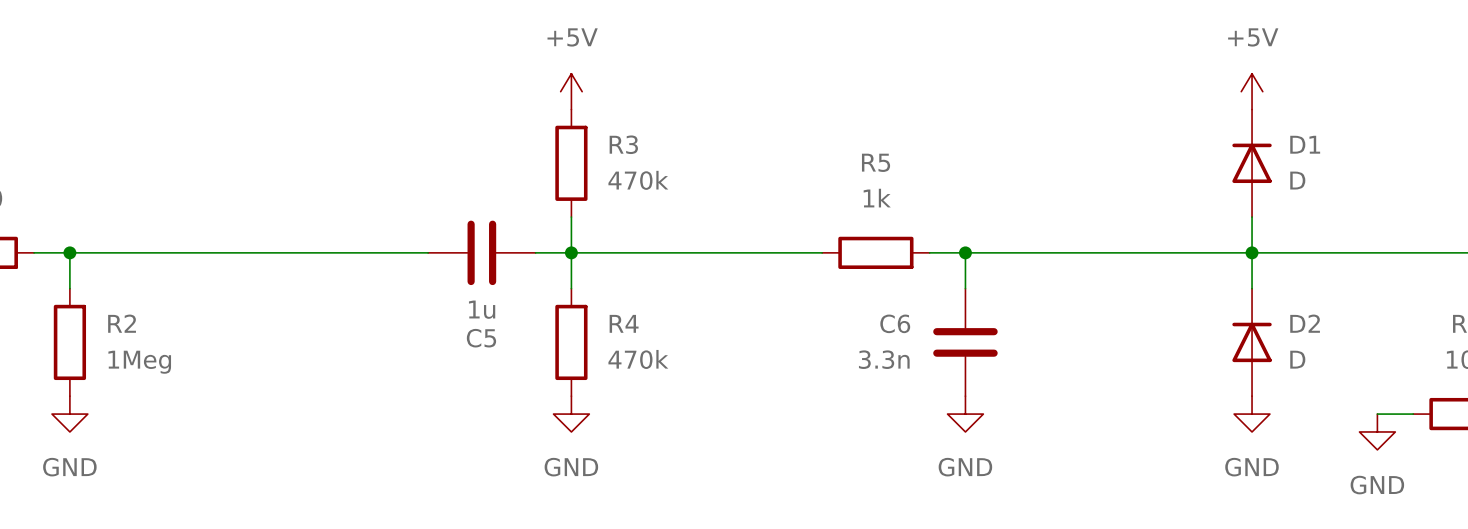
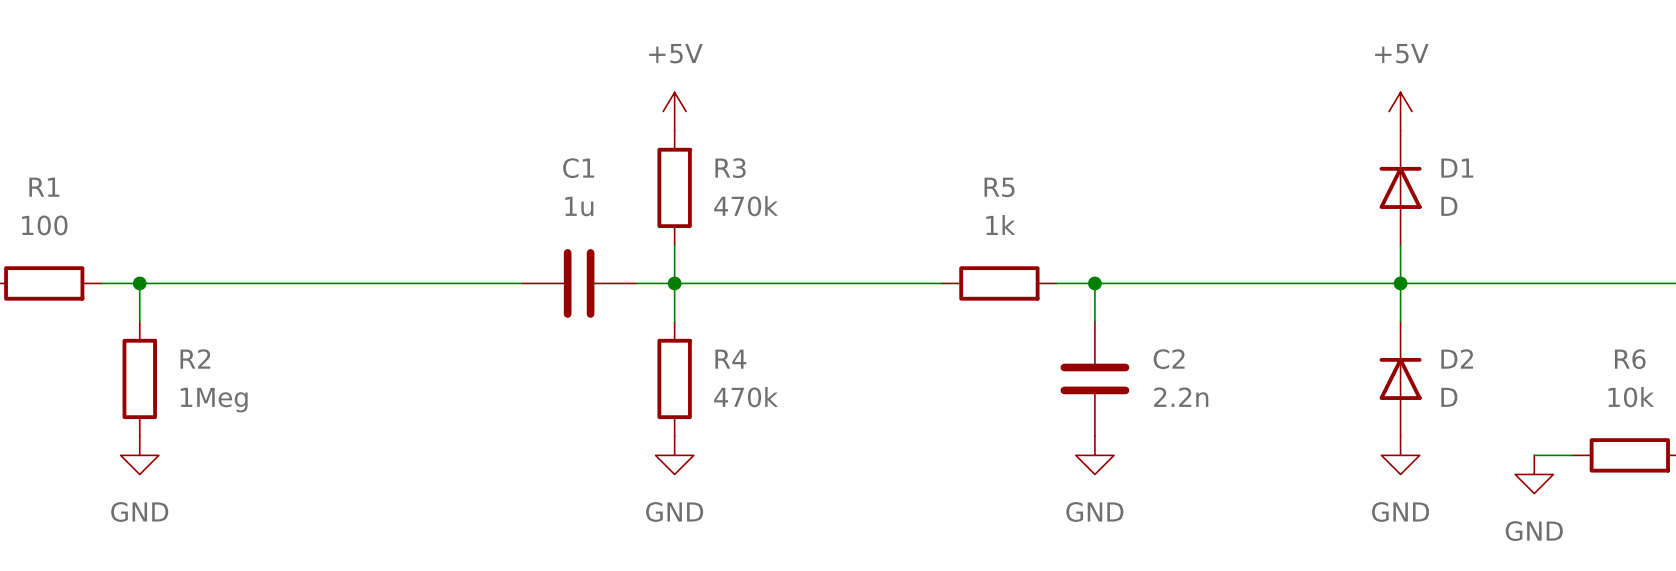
C5 value position: 1u (482, 309) -> 1u (579, 206)
C6 name: C6 (895, 323) -> C2 (1169, 359)
C5 name: C5 (481, 338) -> C1 (578, 168)
C6 value: 3.3n (884, 359) -> 2.2n (1181, 397)

